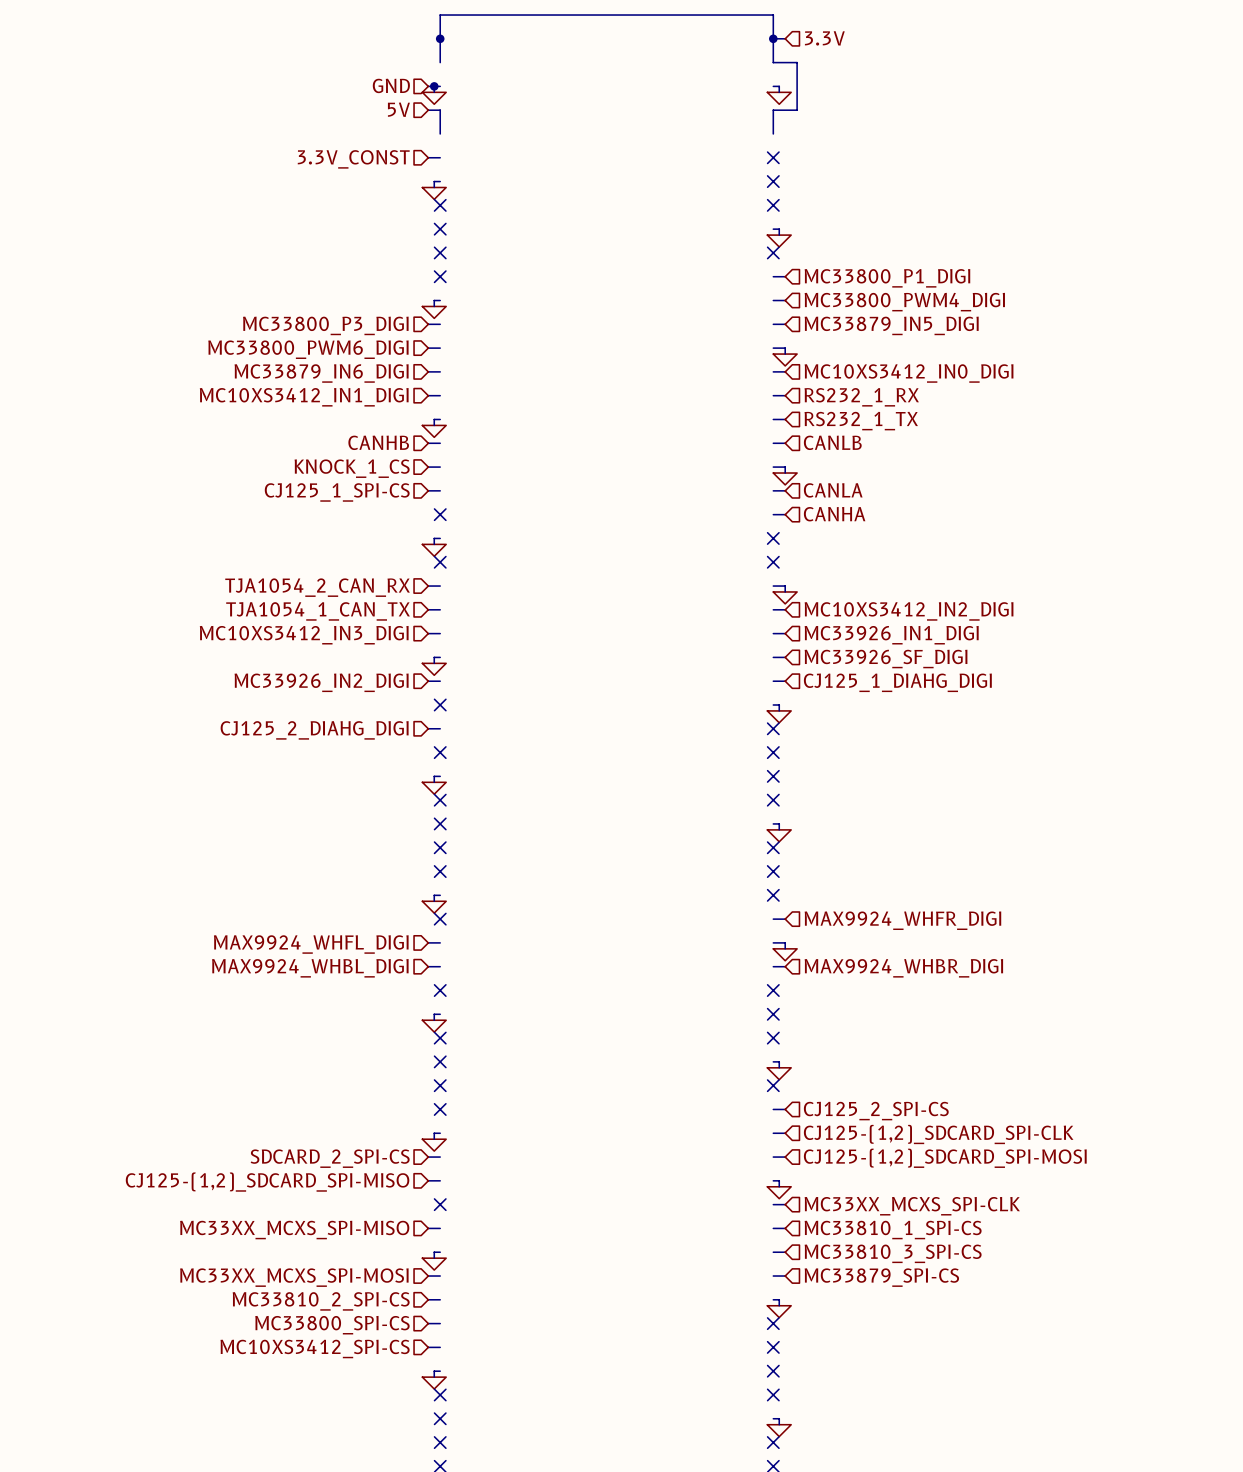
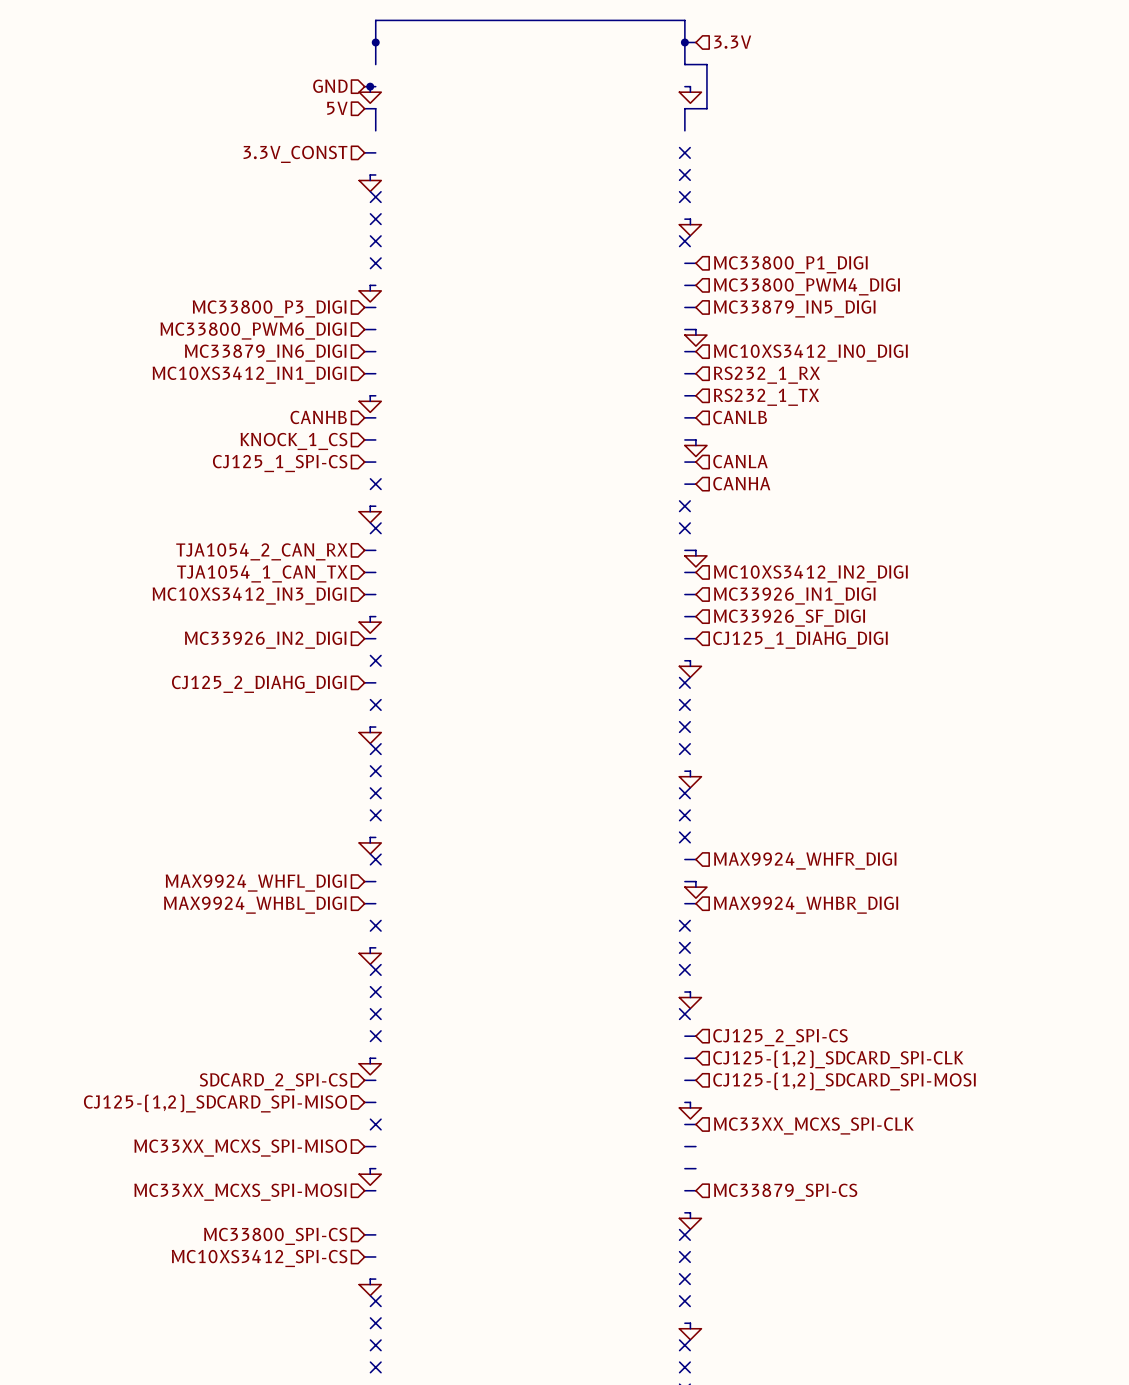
hierarchical label: MC33810_1_SPI-CS (893, 1230) -> none
hierarchical label: MC33810_3_SPI-CS (893, 1253) -> none
wire: (428, 1299) (440, 1299) -> none
hierarchical label: MC33810_2_SPI-CS (321, 1301) -> none

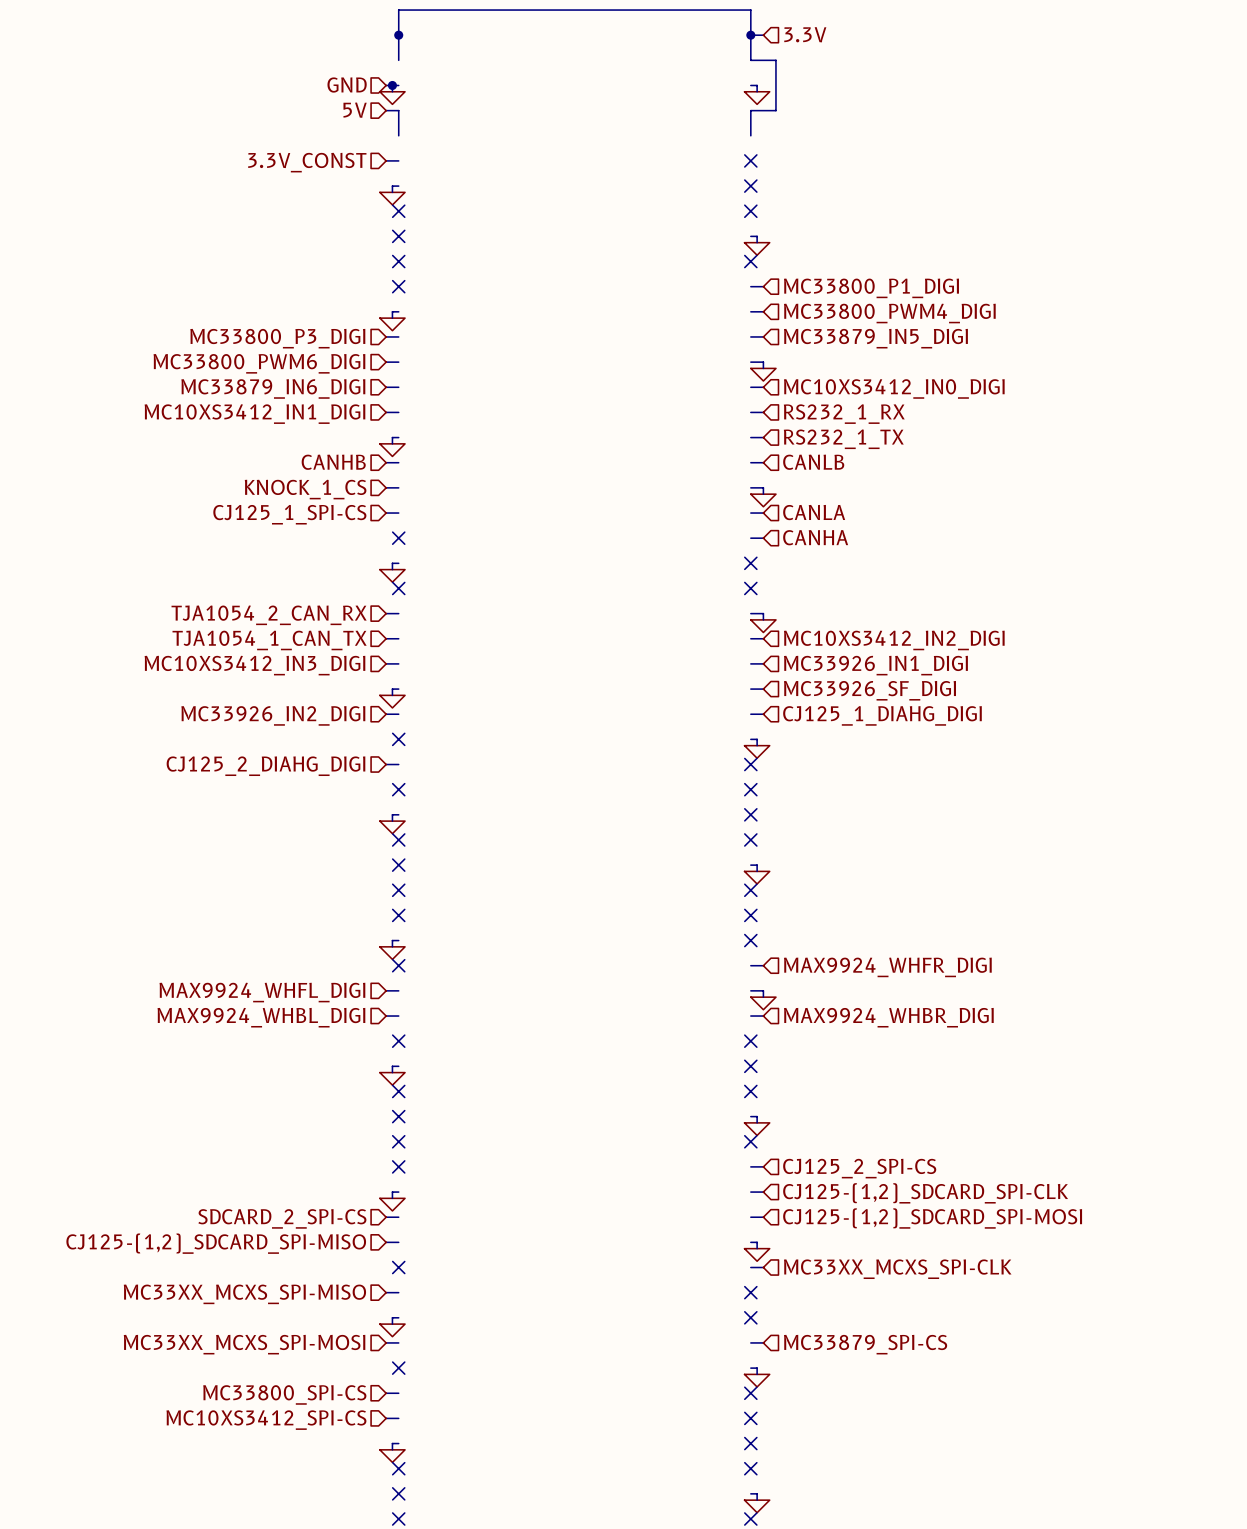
wire: (684, 1146) (695, 1146) -> none
no-connect mark: none -> (750, 1292)
wire: (684, 1168) (695, 1168) -> none
no-connect mark: none -> (750, 1317)
no-connect mark: none -> (398, 1368)

